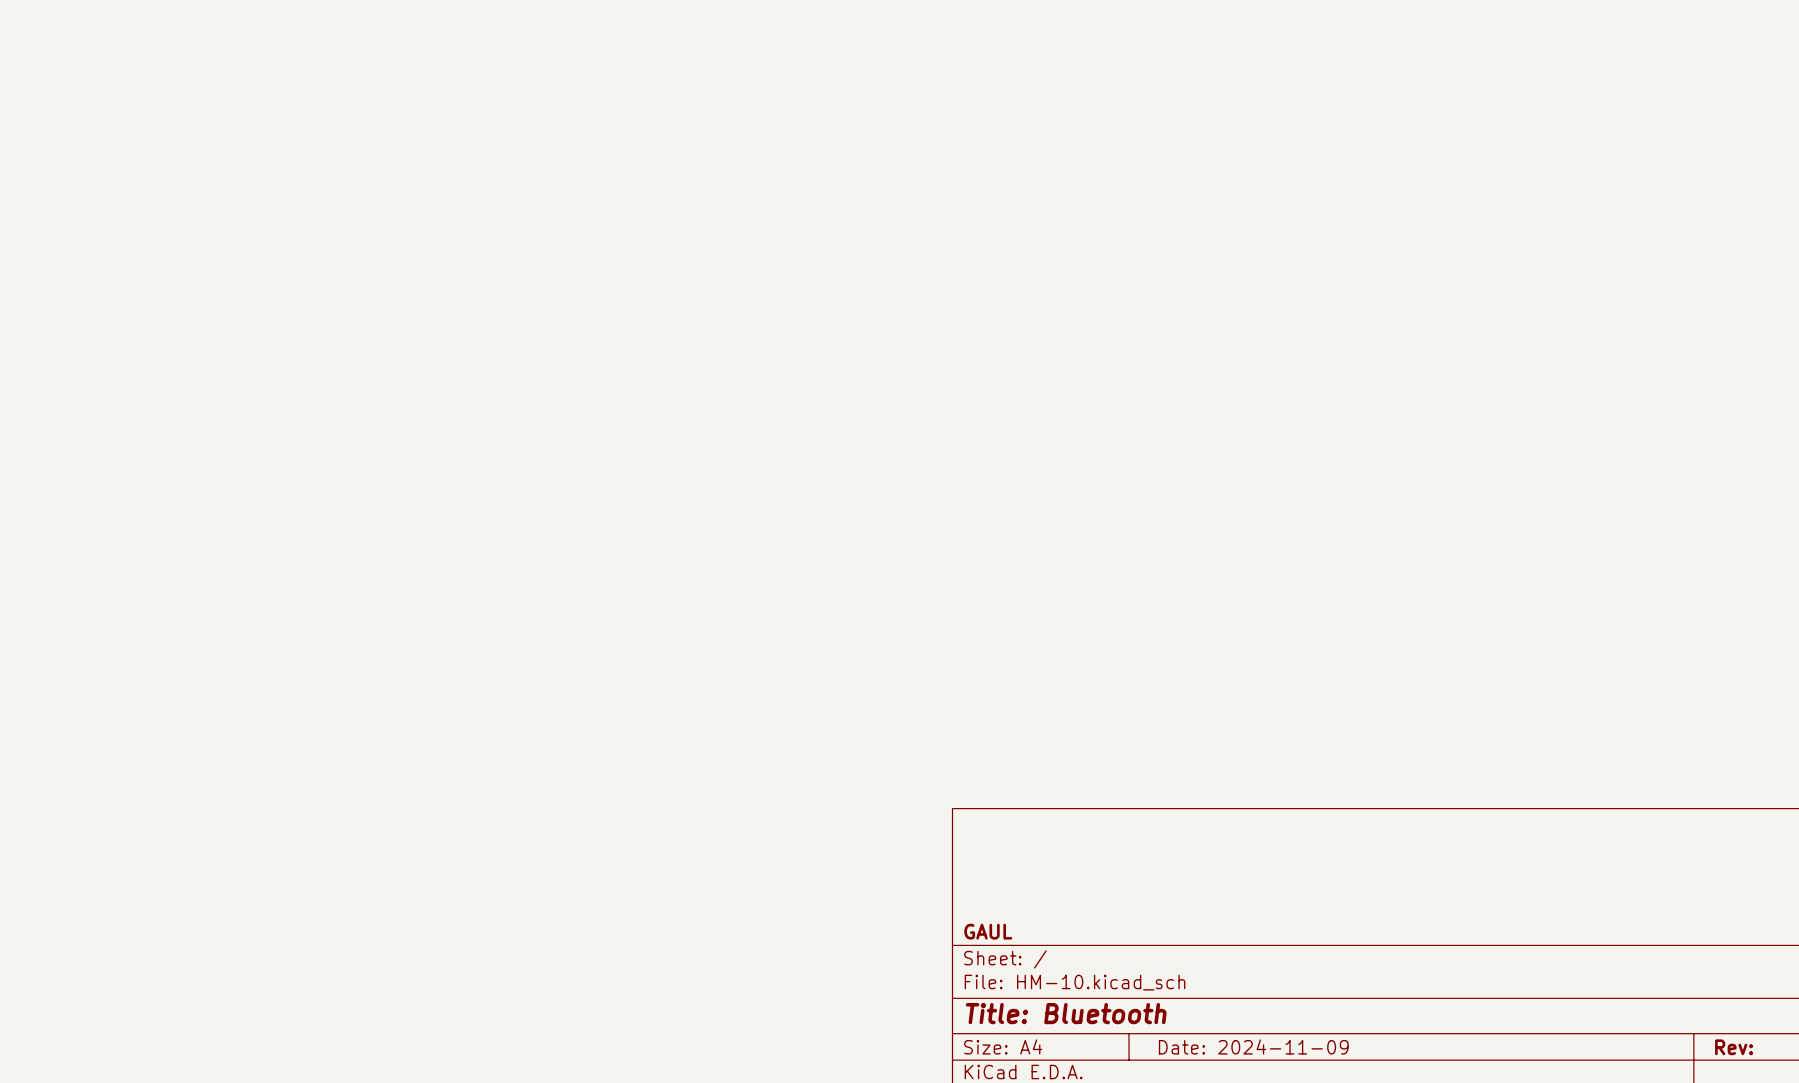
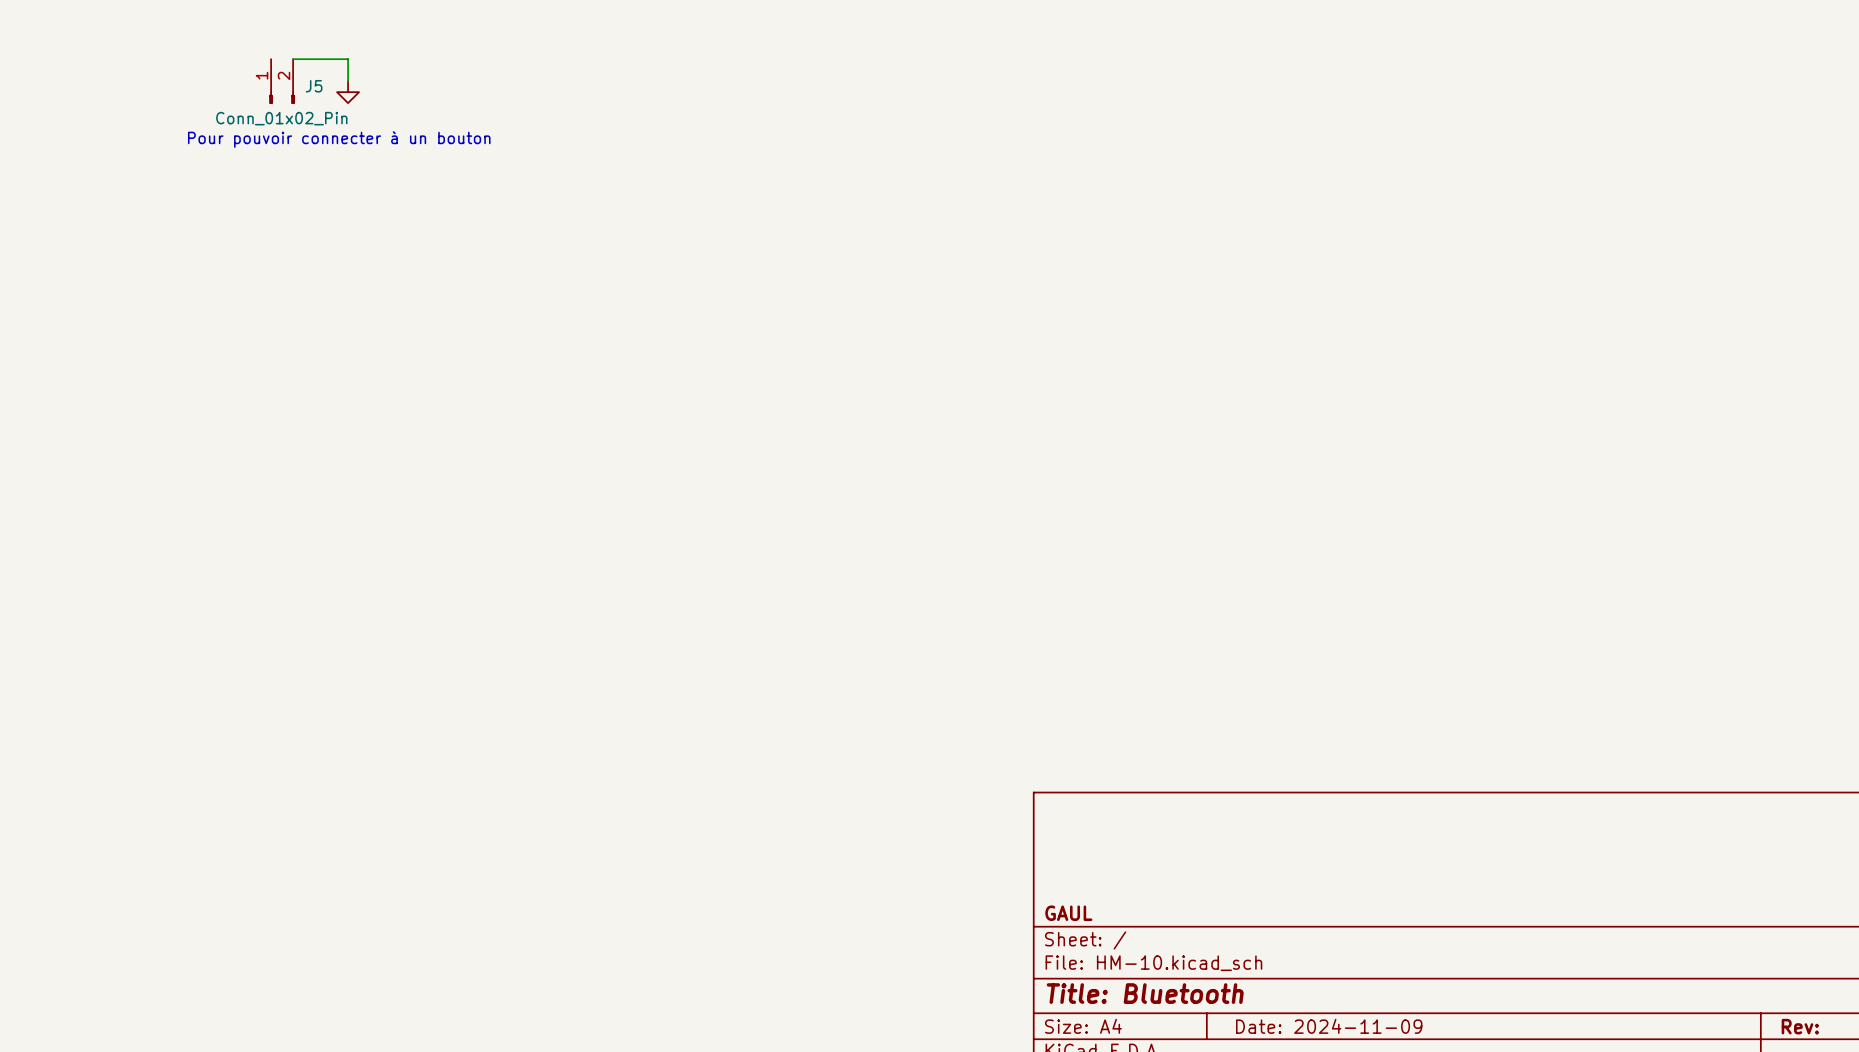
wire: none -> (293, 59) (348, 59) (348, 81)
J5: none -> Conn_01x02_Pin (282, 81)
power symbol: none -> (348, 92)
text: none -> Pour pouvoir connecter à un bouton (339, 139)

